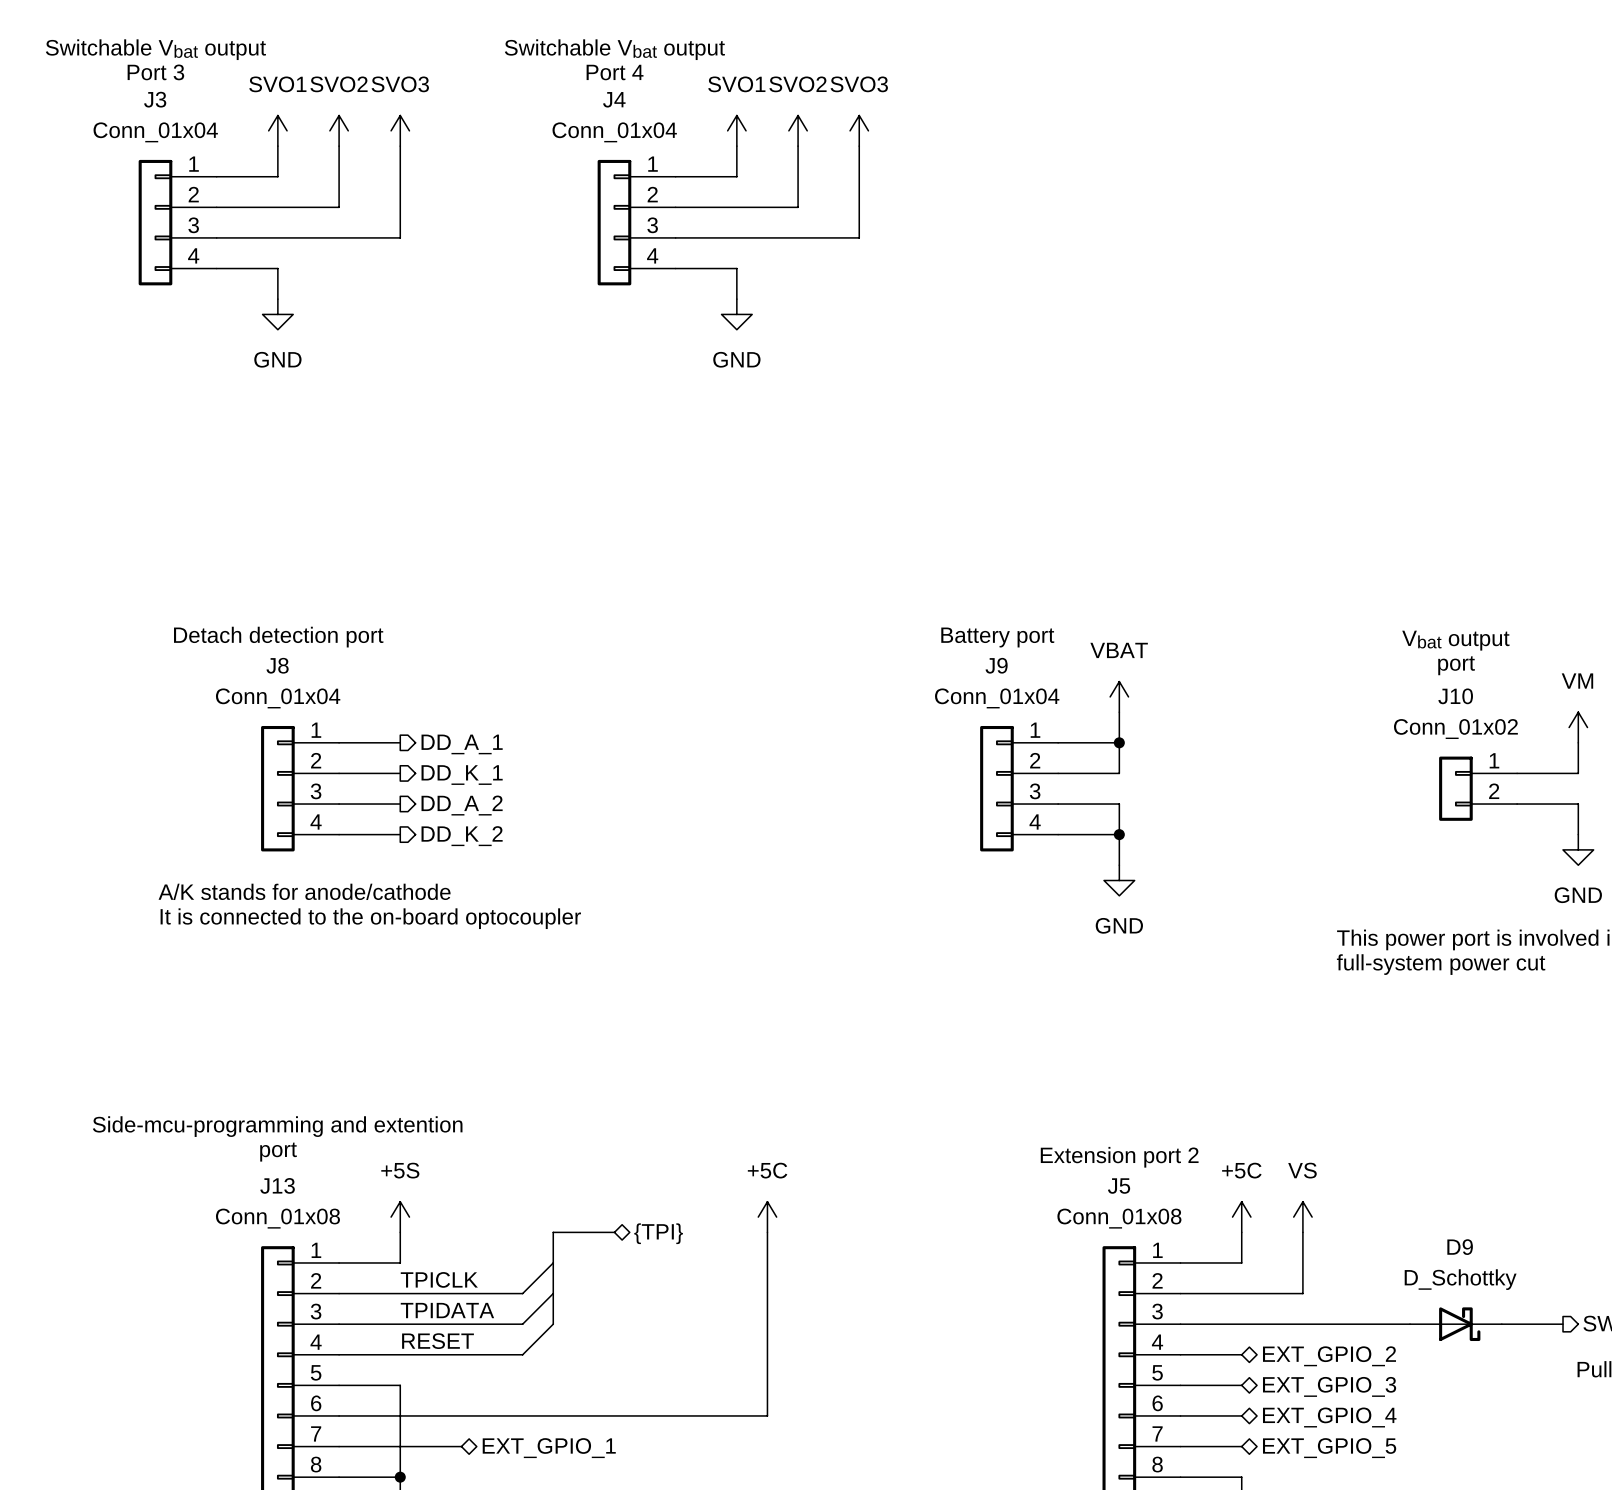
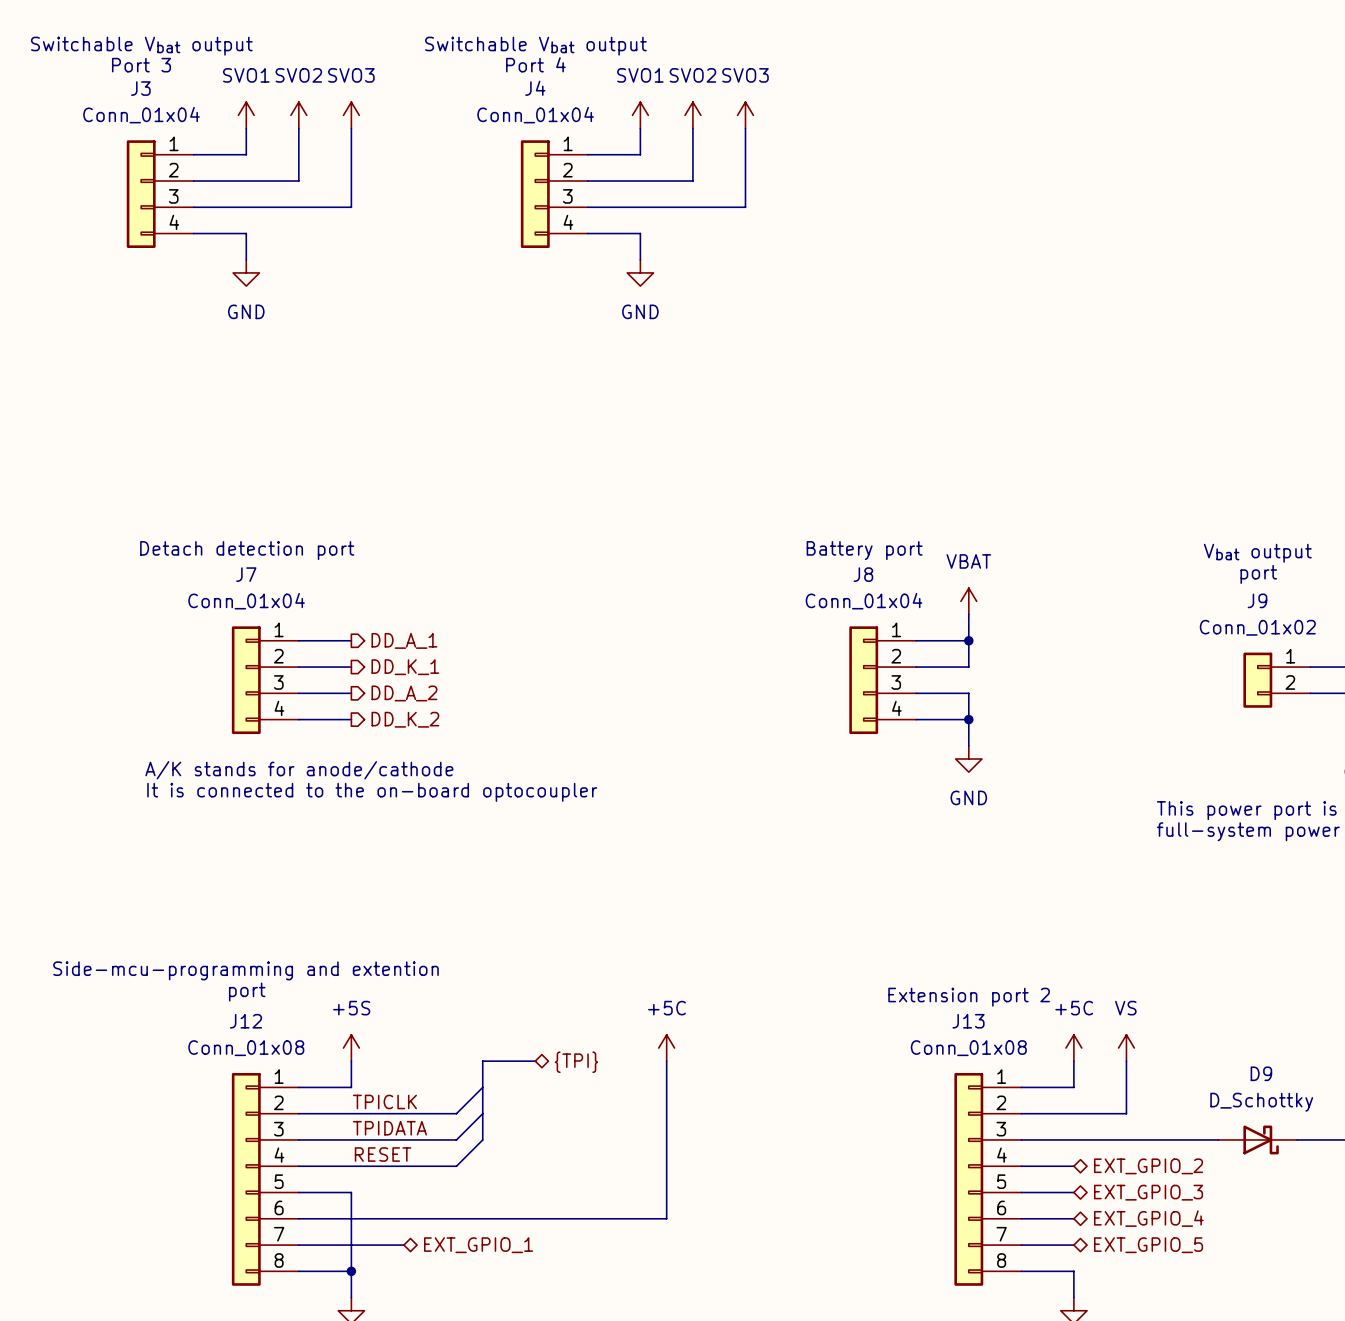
J8 name: J8 (277, 665) -> J7 (246, 574)
J9 name: J9 (996, 665) -> J8 (863, 574)
J10 name: J10 (1455, 696) -> J9 (1257, 600)
J13 name: J13 (277, 1185) -> J12 (245, 1021)
J5 name: J5 (1119, 1186) -> J13 (968, 1021)

